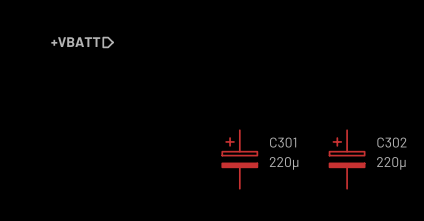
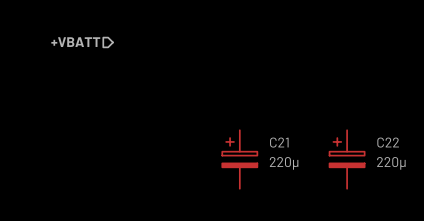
C301 name: C301 (283, 142) -> C21 (279, 142)
C302 name: C302 (391, 142) -> C22 (388, 142)

